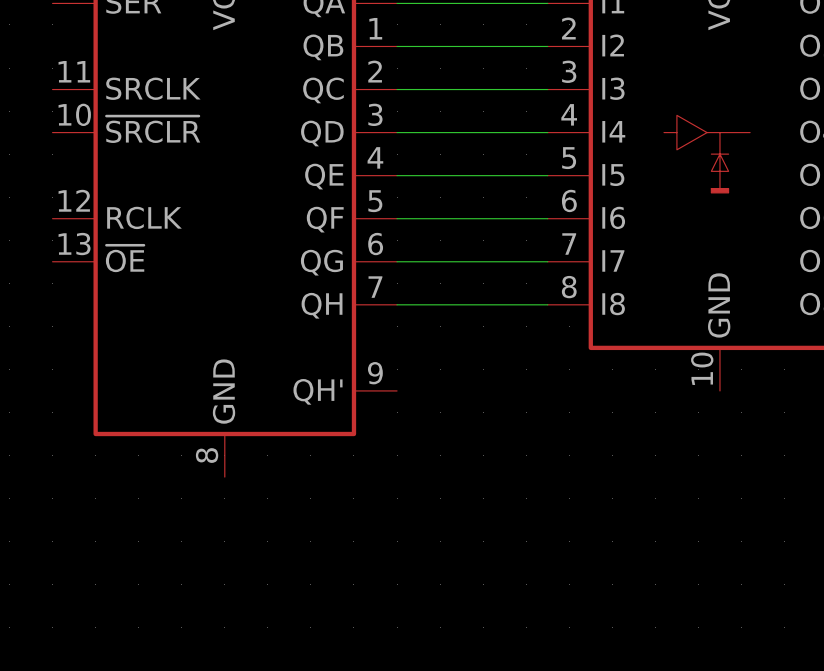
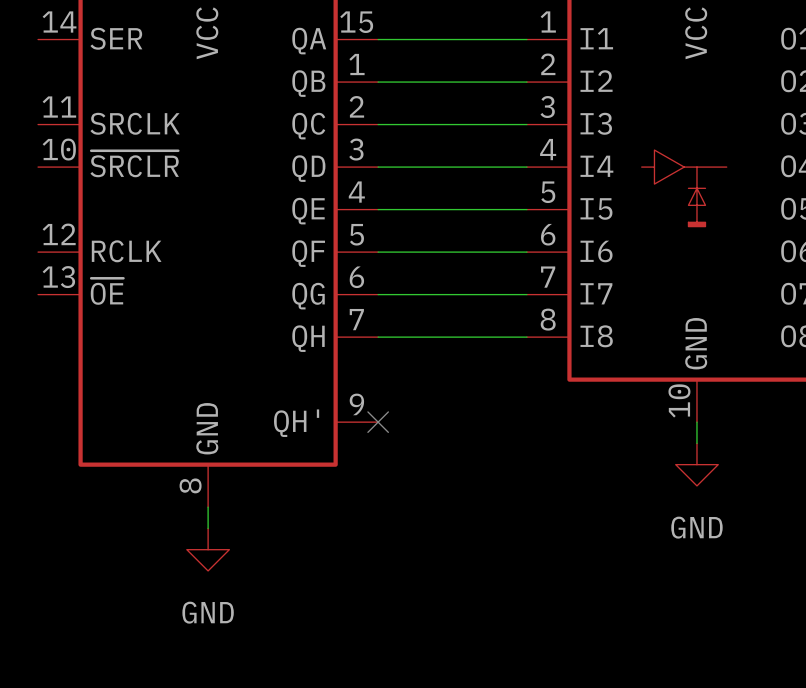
no-connect mark: none -> (378, 422)
wire: none -> (696, 422) (696, 443)
power symbol: none -> GND (696, 464)
wire: none -> (208, 507) (208, 528)
power symbol: none -> GND (208, 549)

